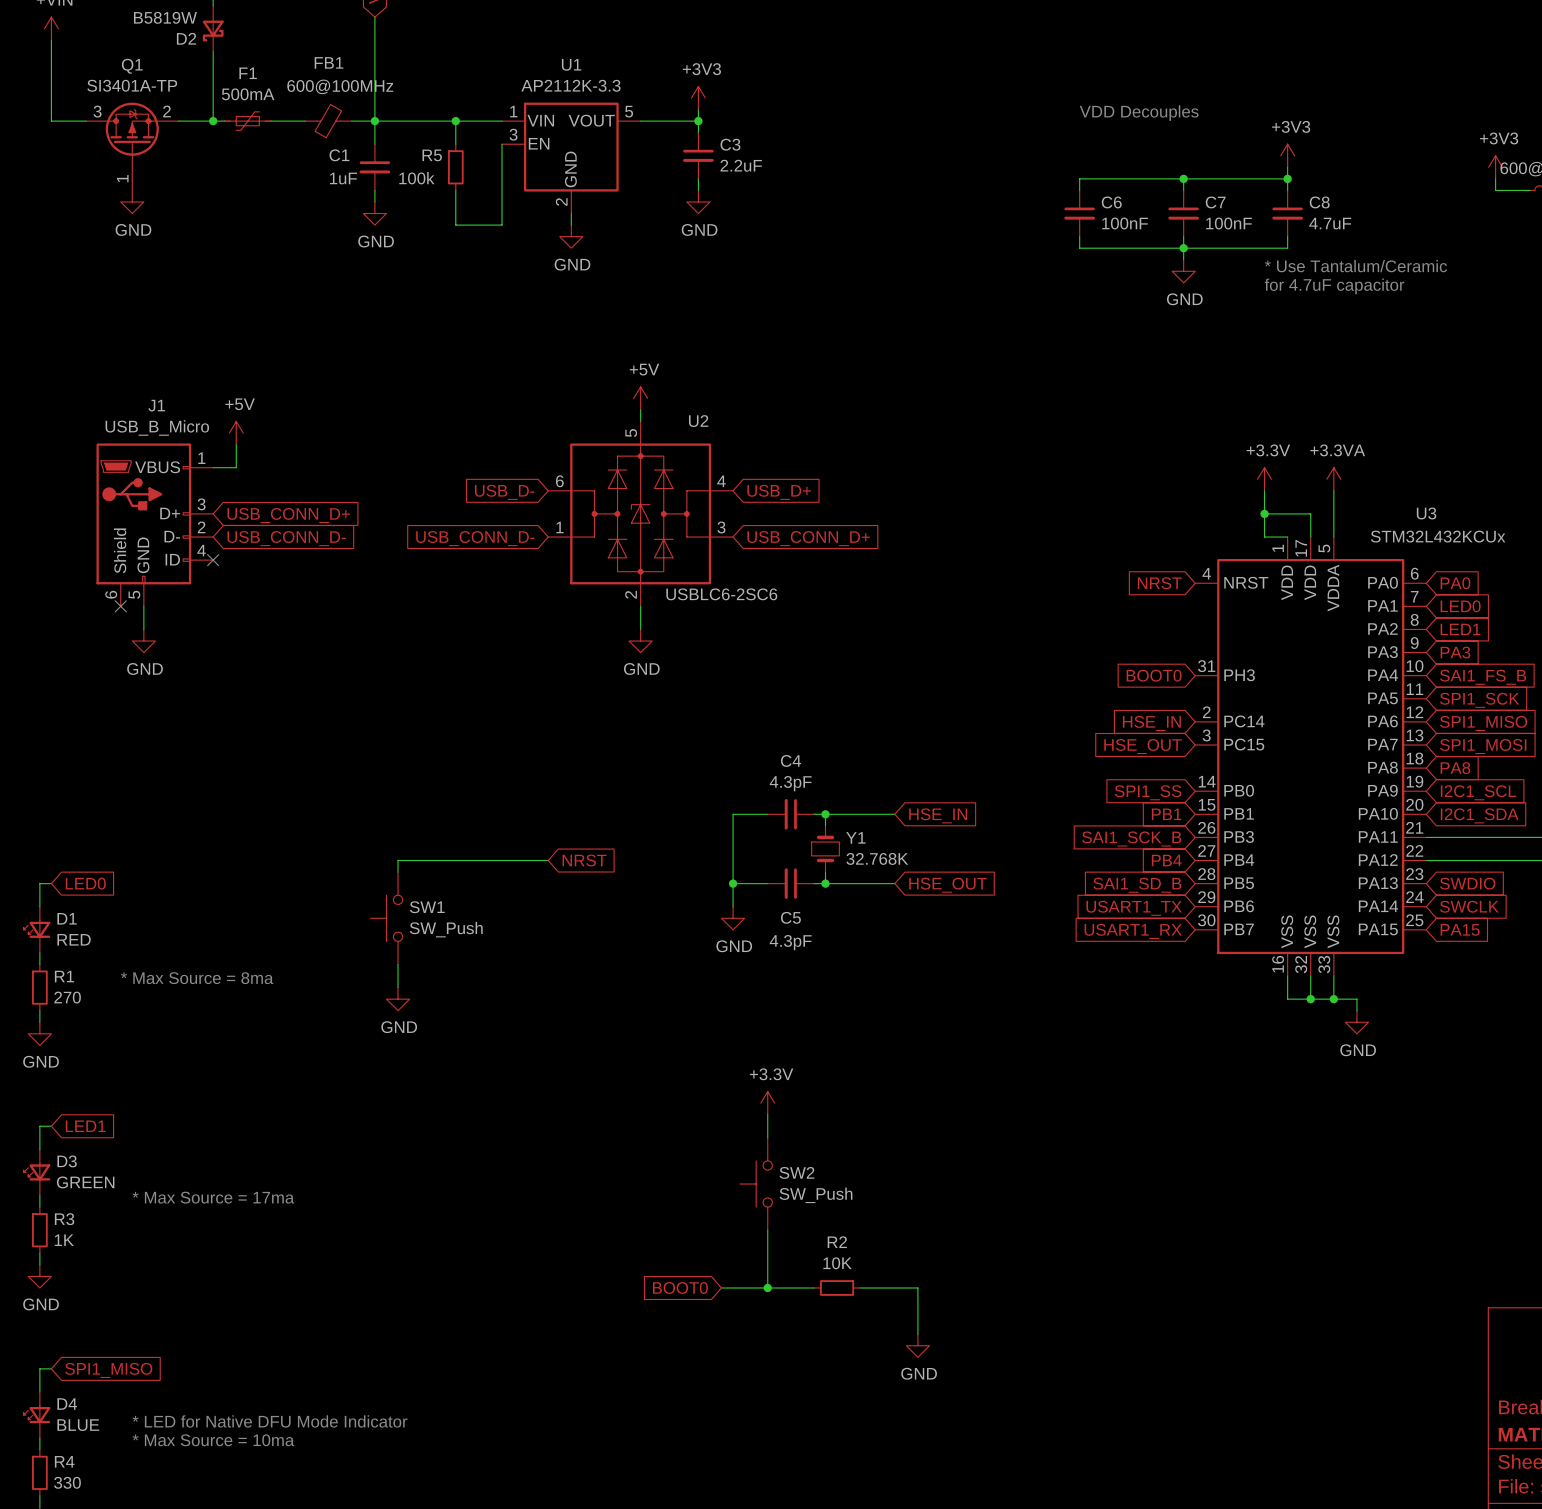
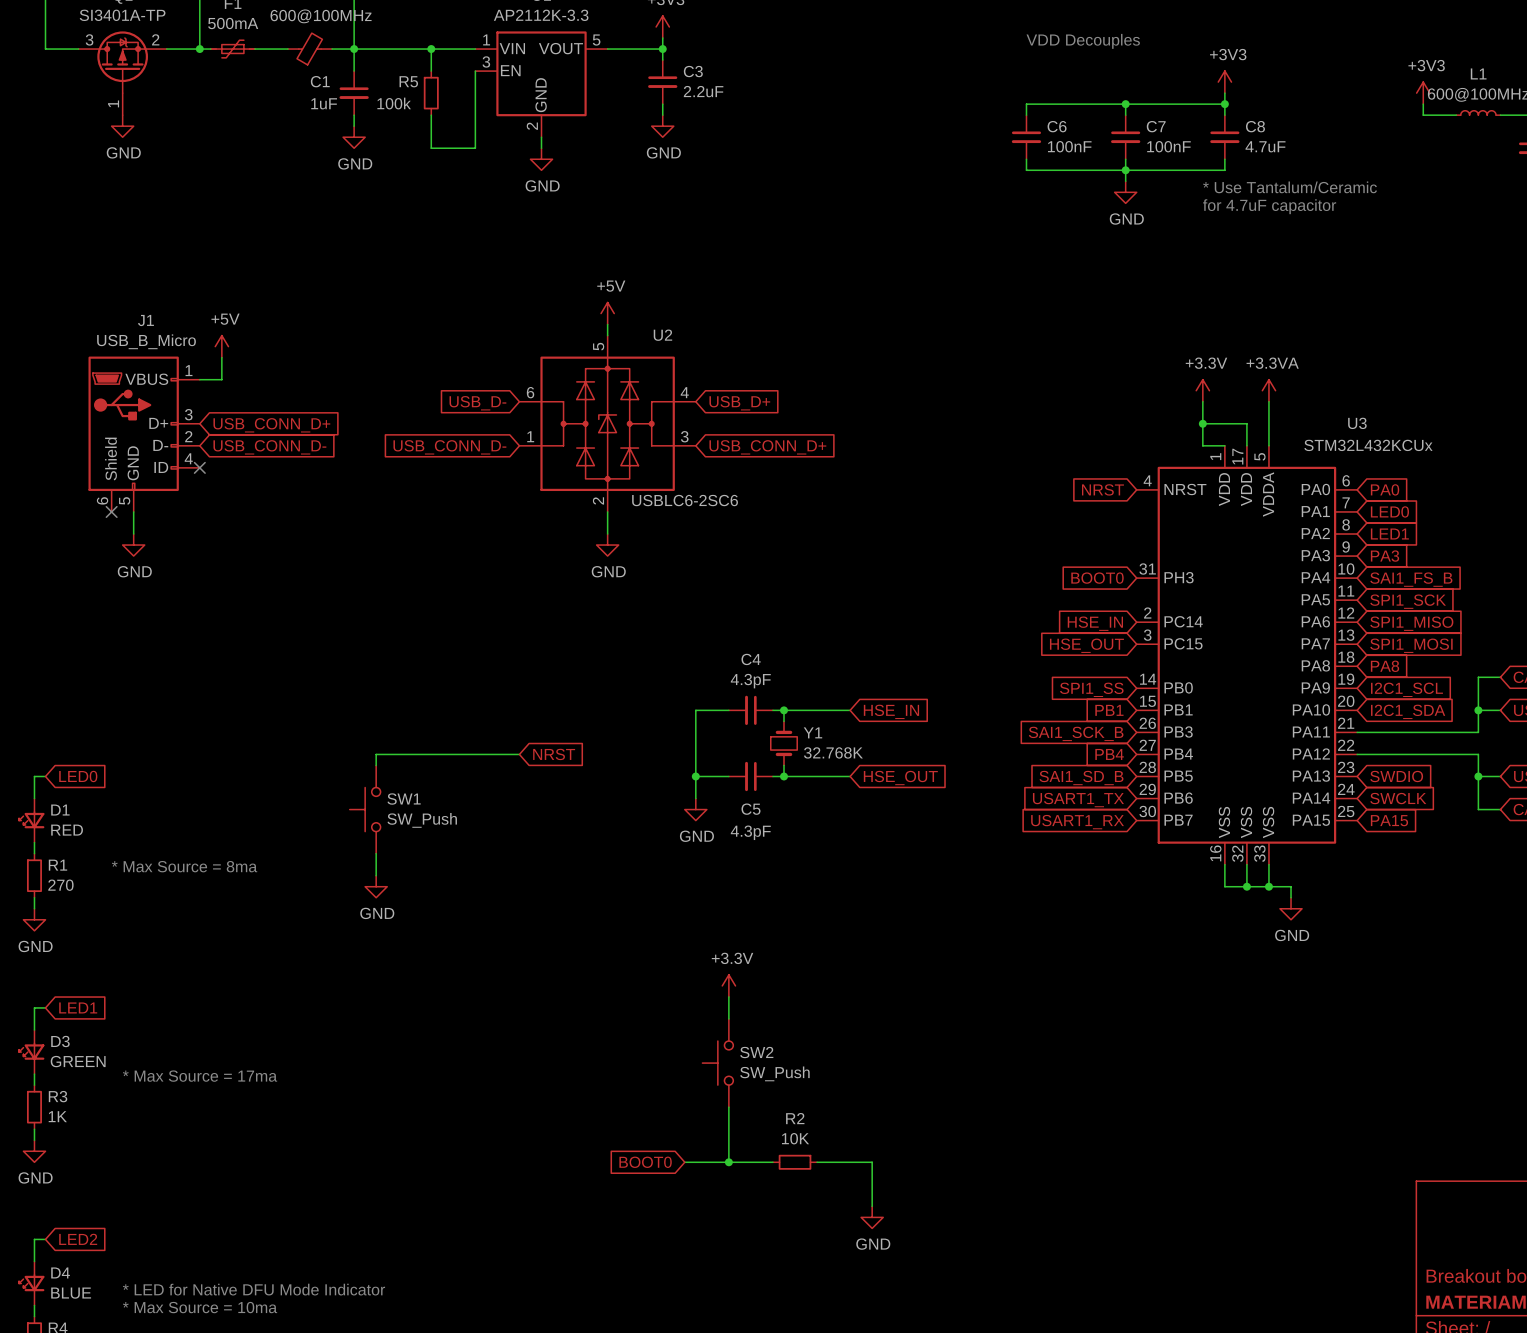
global label: SPI1_MISO (108, 1370) -> LED2 (78, 1239)

